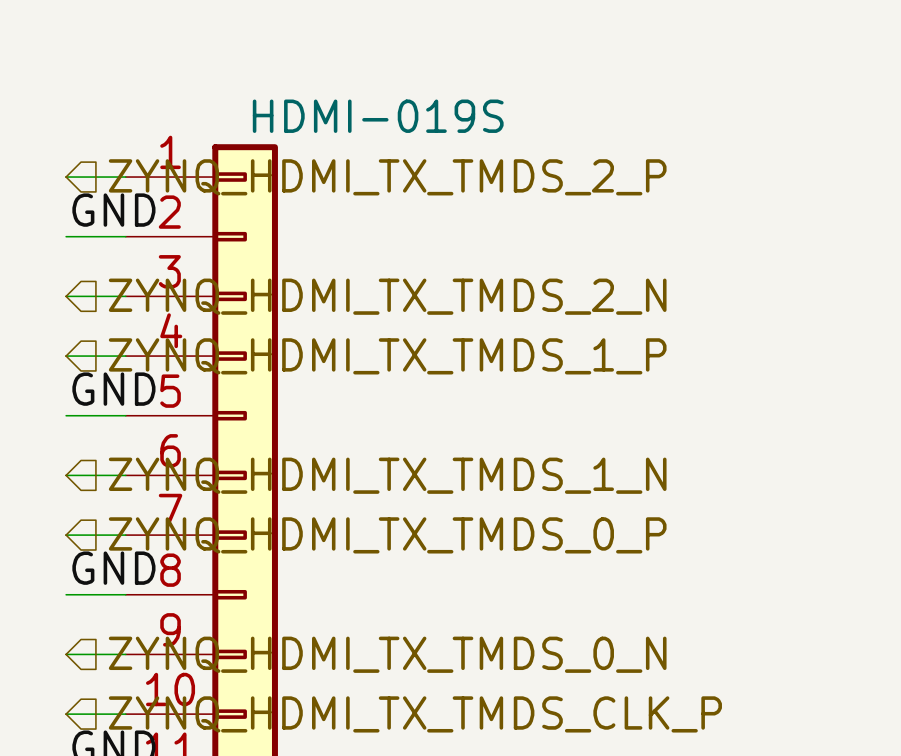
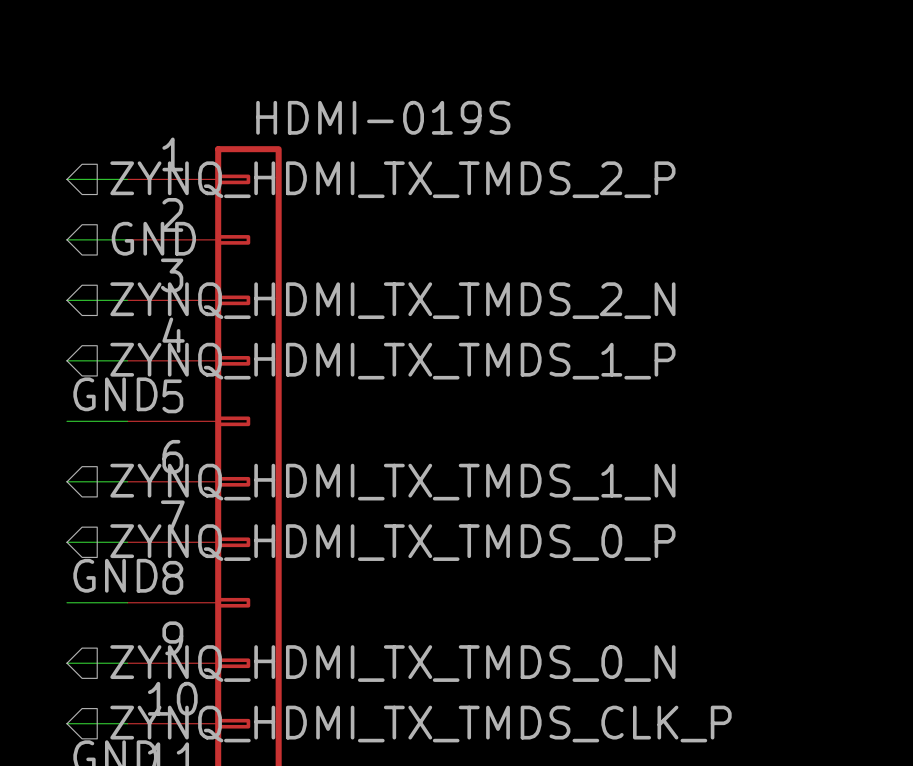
label: GND (113, 210) -> none
hierarchical label: none -> GND (153, 238)

